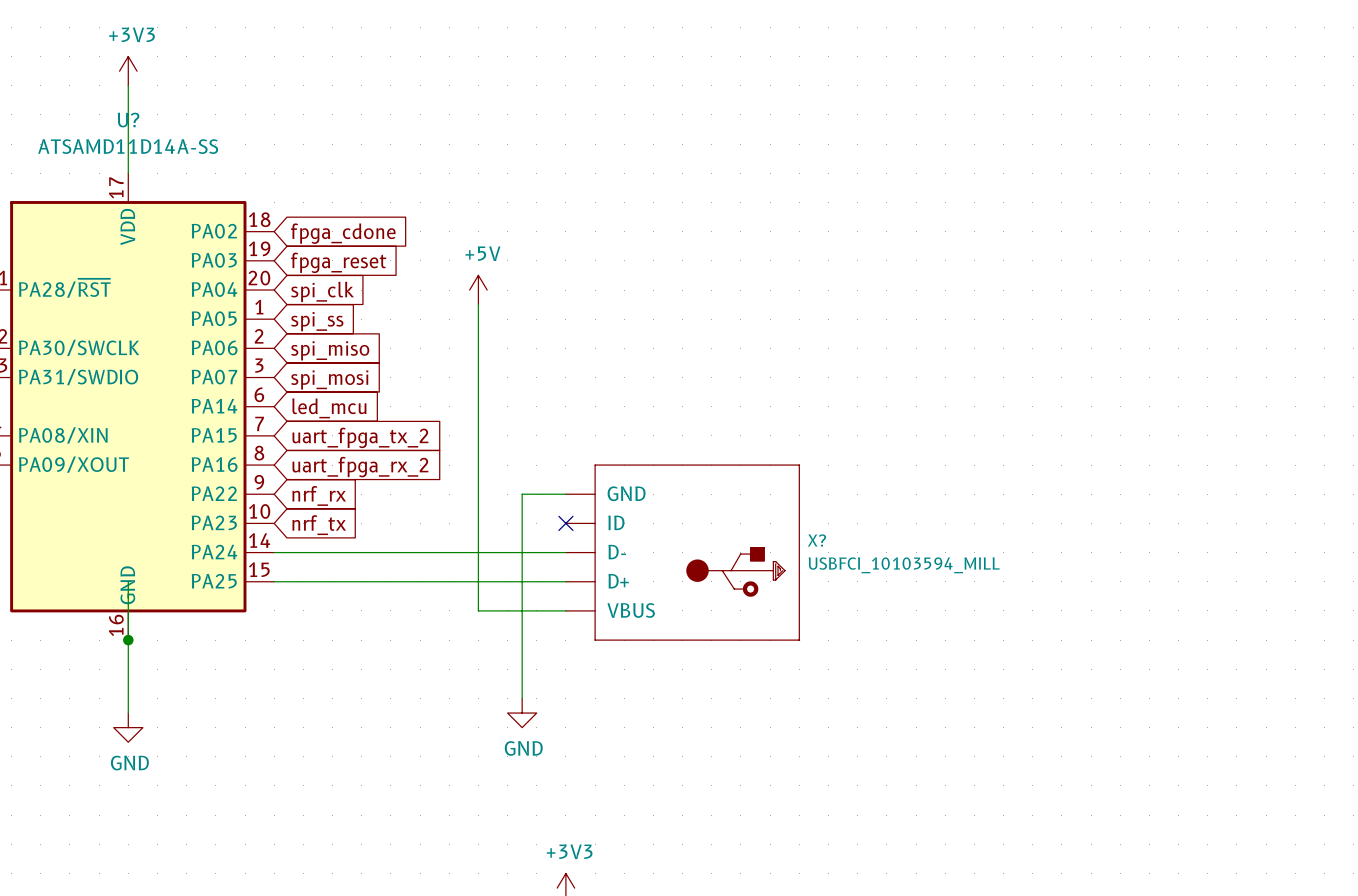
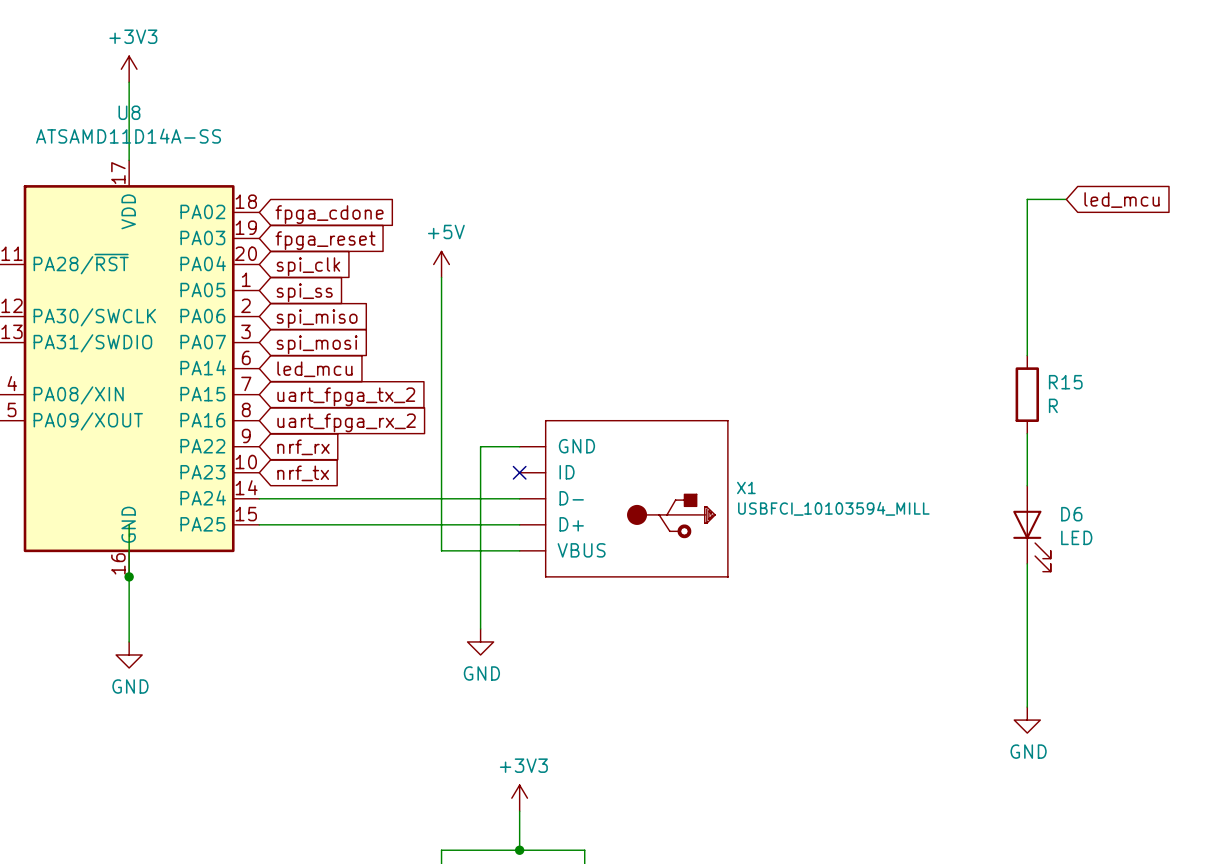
U? name: U? (128, 120) -> U8 (129, 112)
wire: none -> (1066, 199) (1027, 199) (1027, 355)
global label: none -> led_mcu (1121, 200)
R15: none -> R (1027, 394)
wire: none -> (1027, 433) (1027, 485)
X? name: X? (816, 540) -> X1 (746, 487)
D6: none -> LED (1031, 528)
wire: none -> (1027, 563) (1027, 707)
power symbol: none -> GND (1027, 720)

